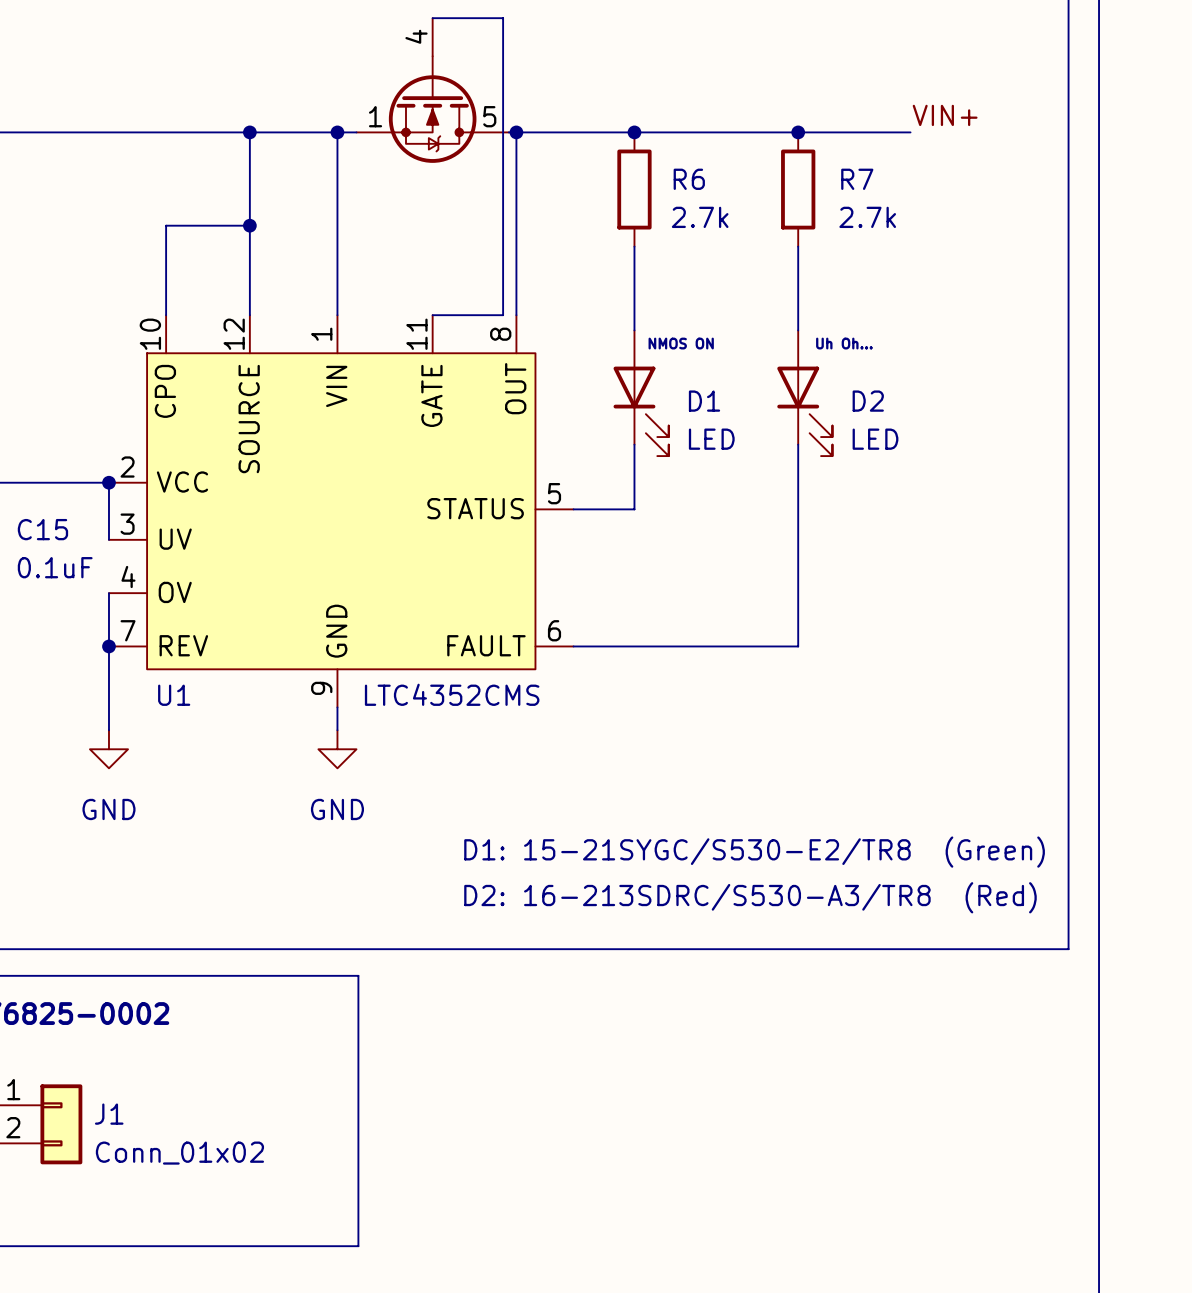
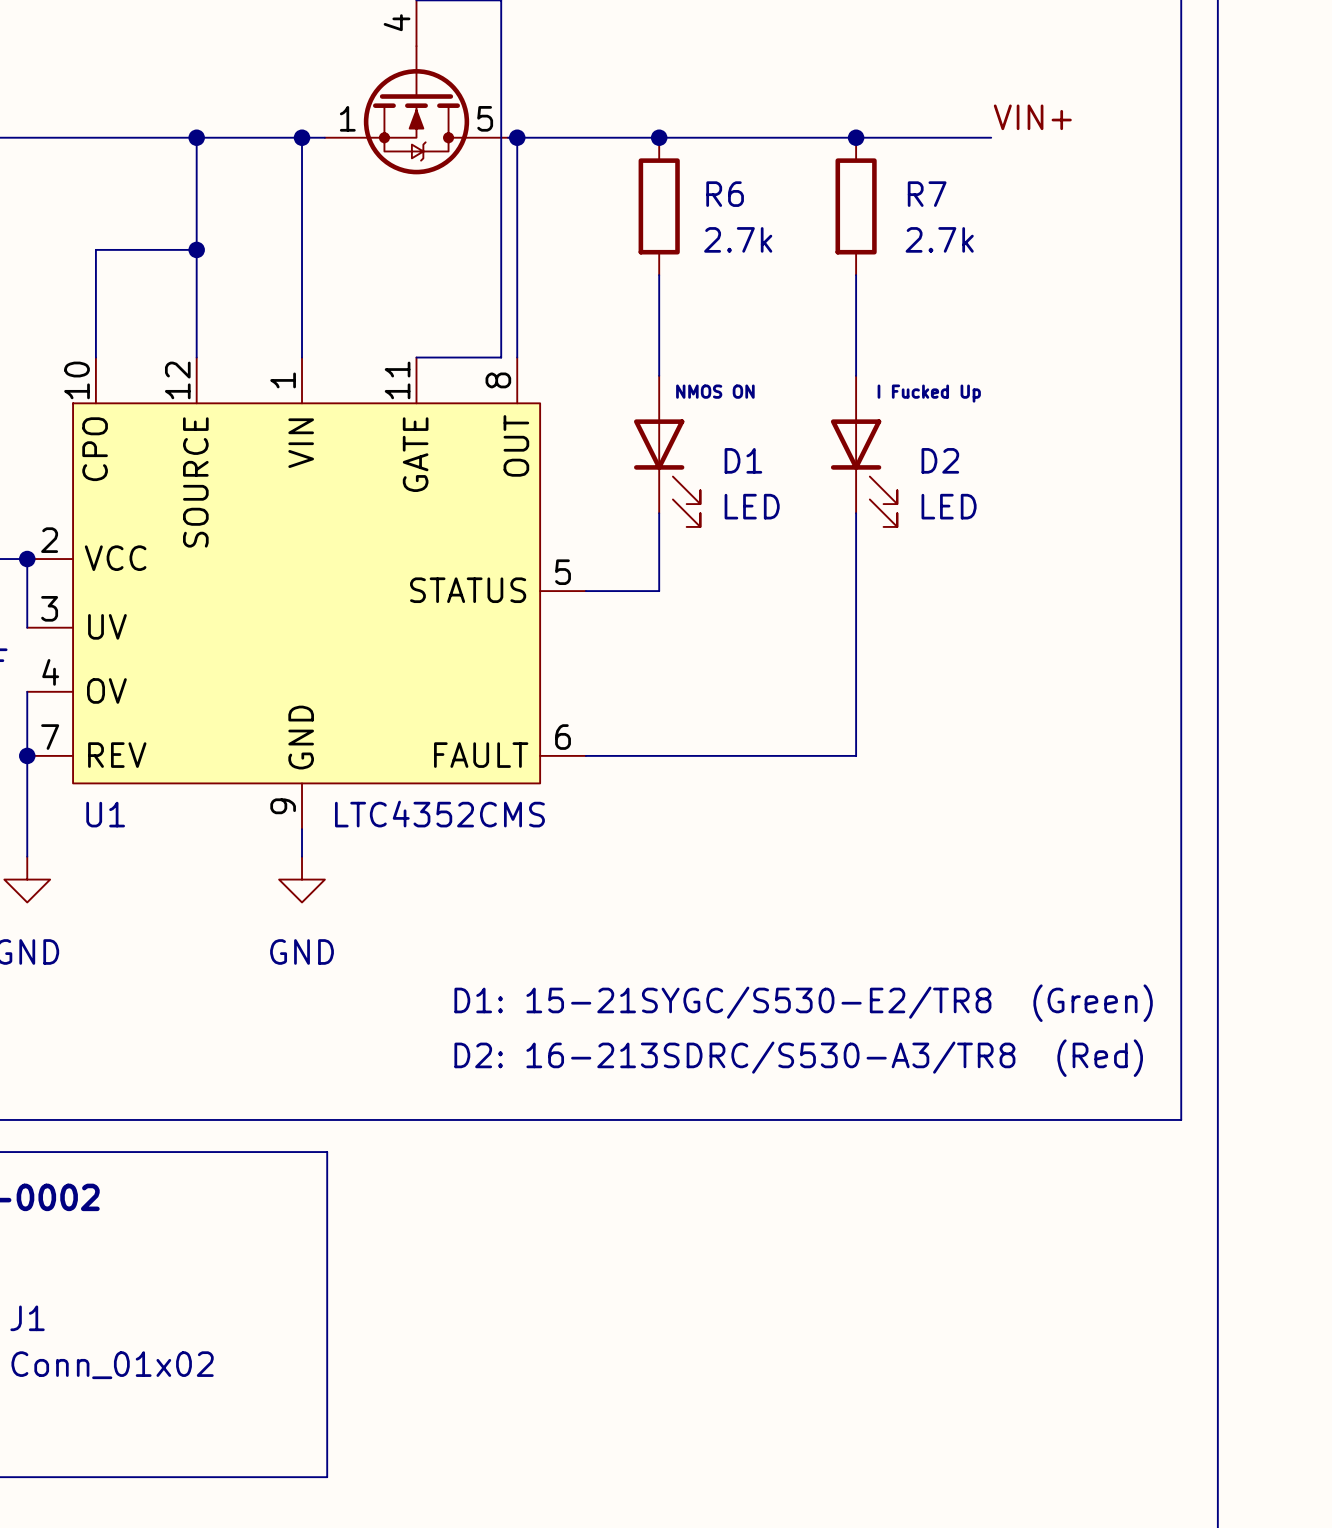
text: Uh Oh... (844, 343) -> I Fucked Up (929, 393)

